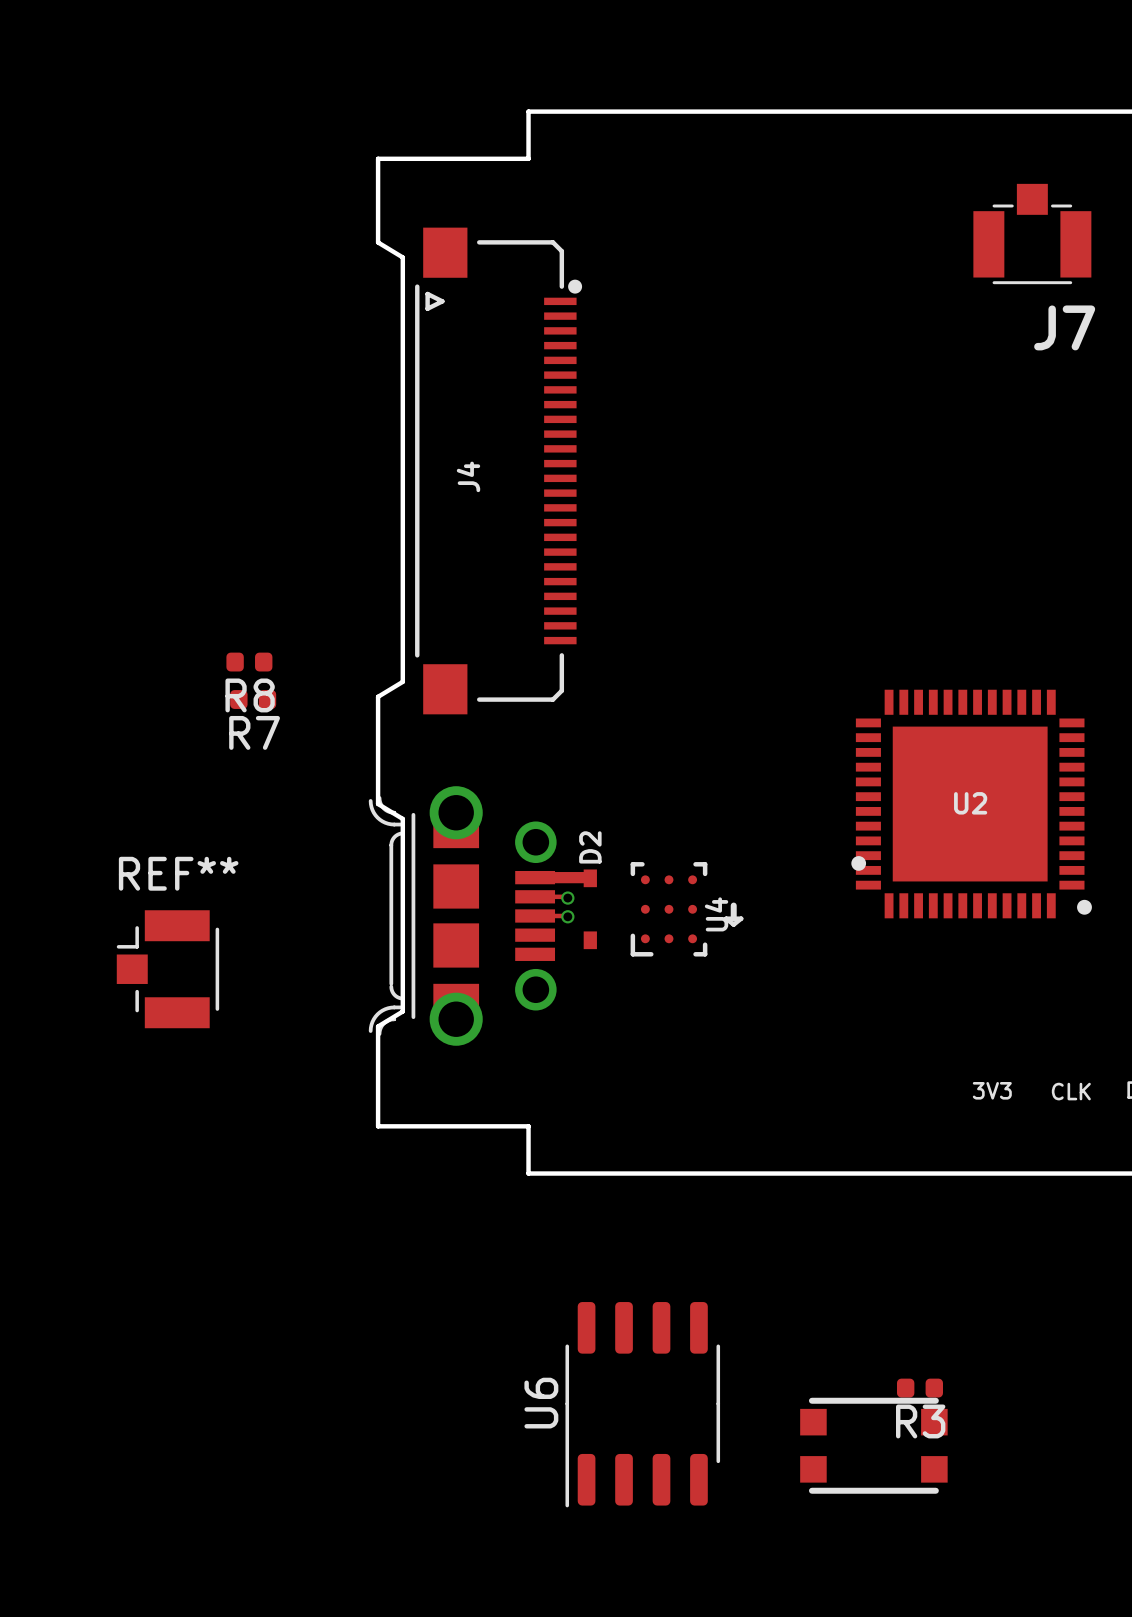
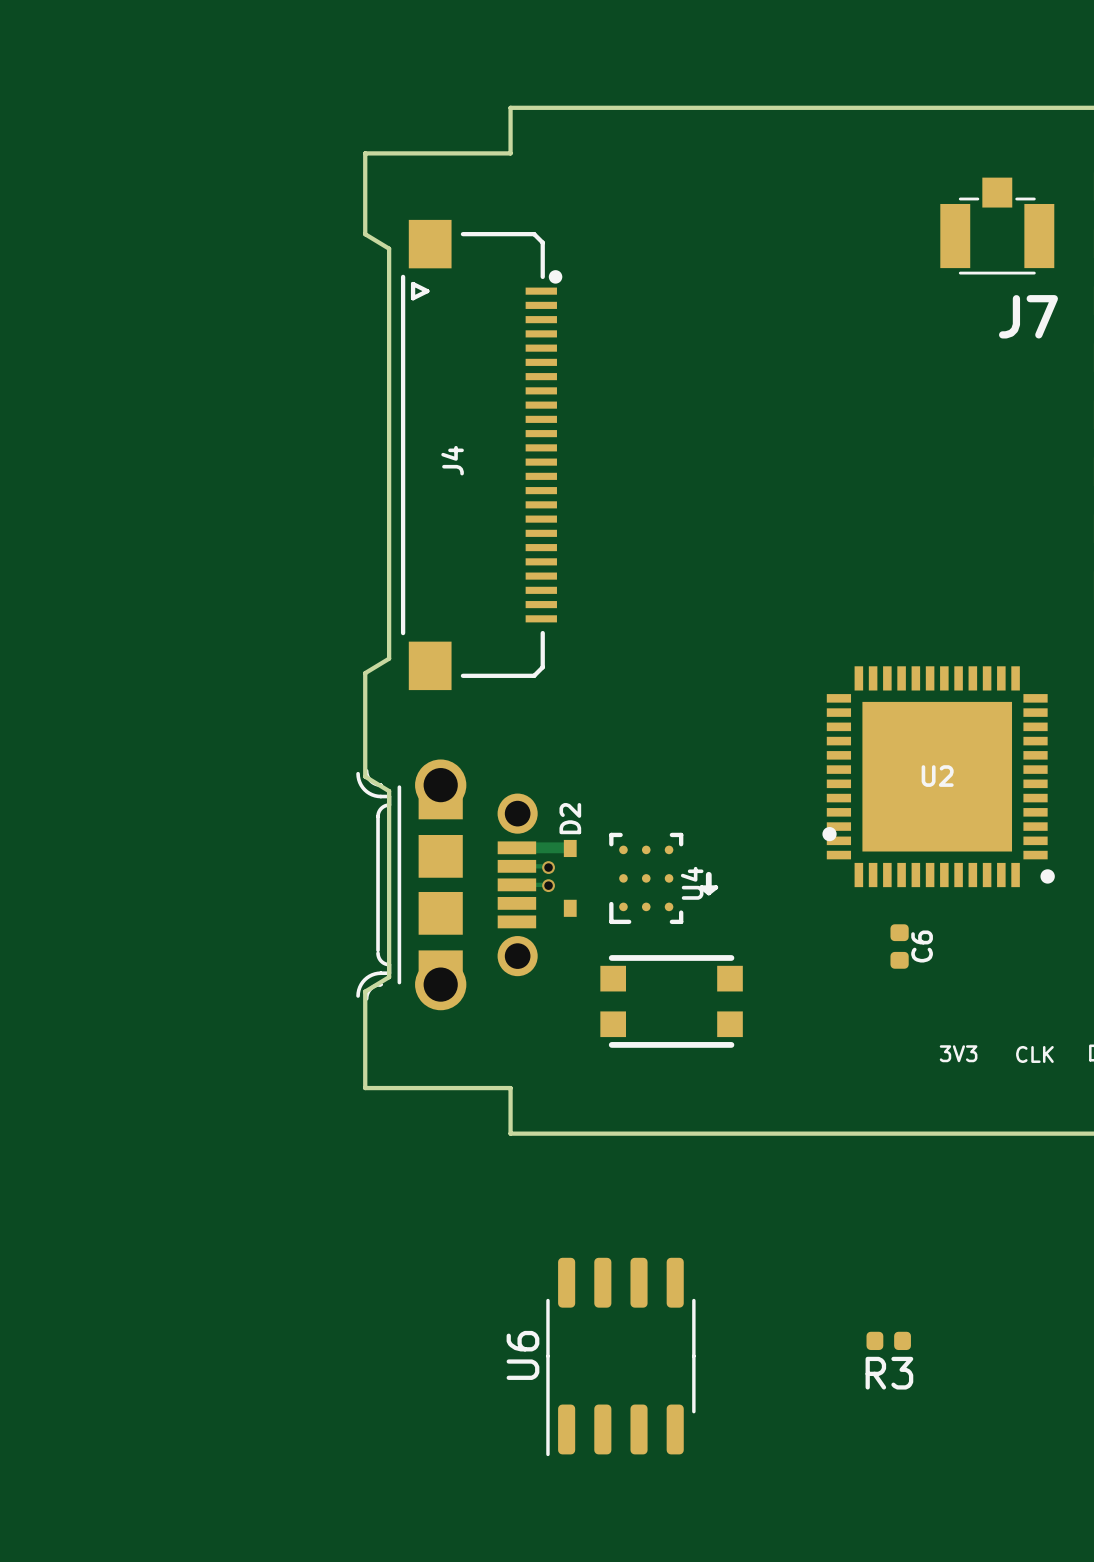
R8: (249, 662) -> none
R7: (253, 699) -> none
REF**: (167, 969) -> none
C6: none -> (899, 946)
part position: (873, 1445) -> (671, 1001)

